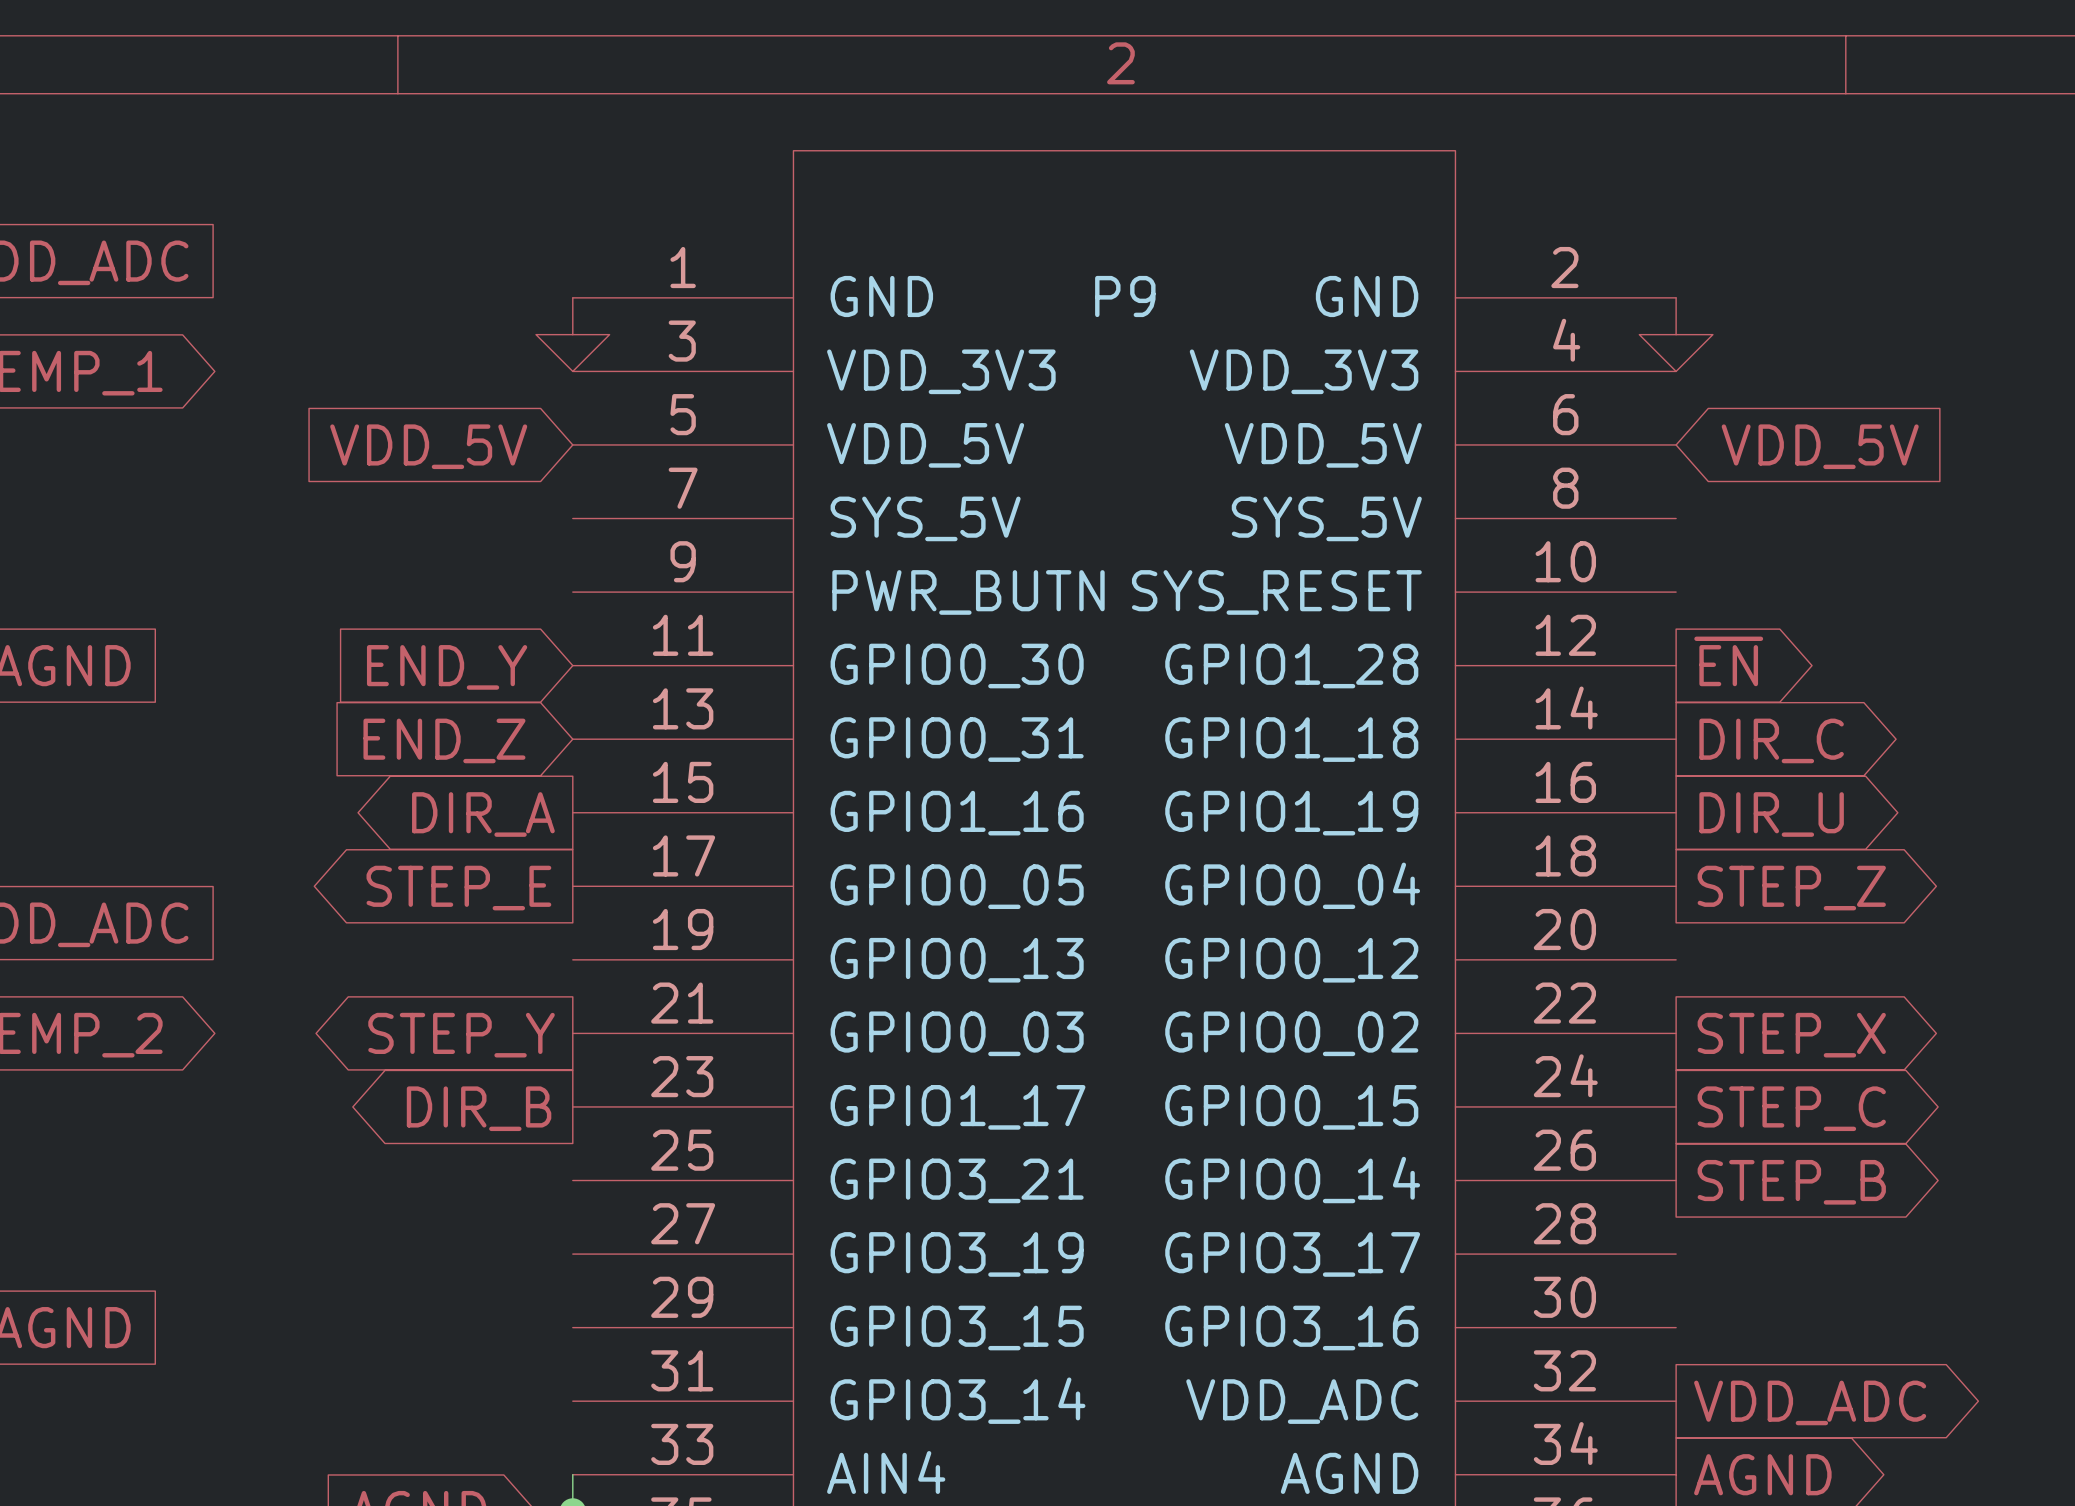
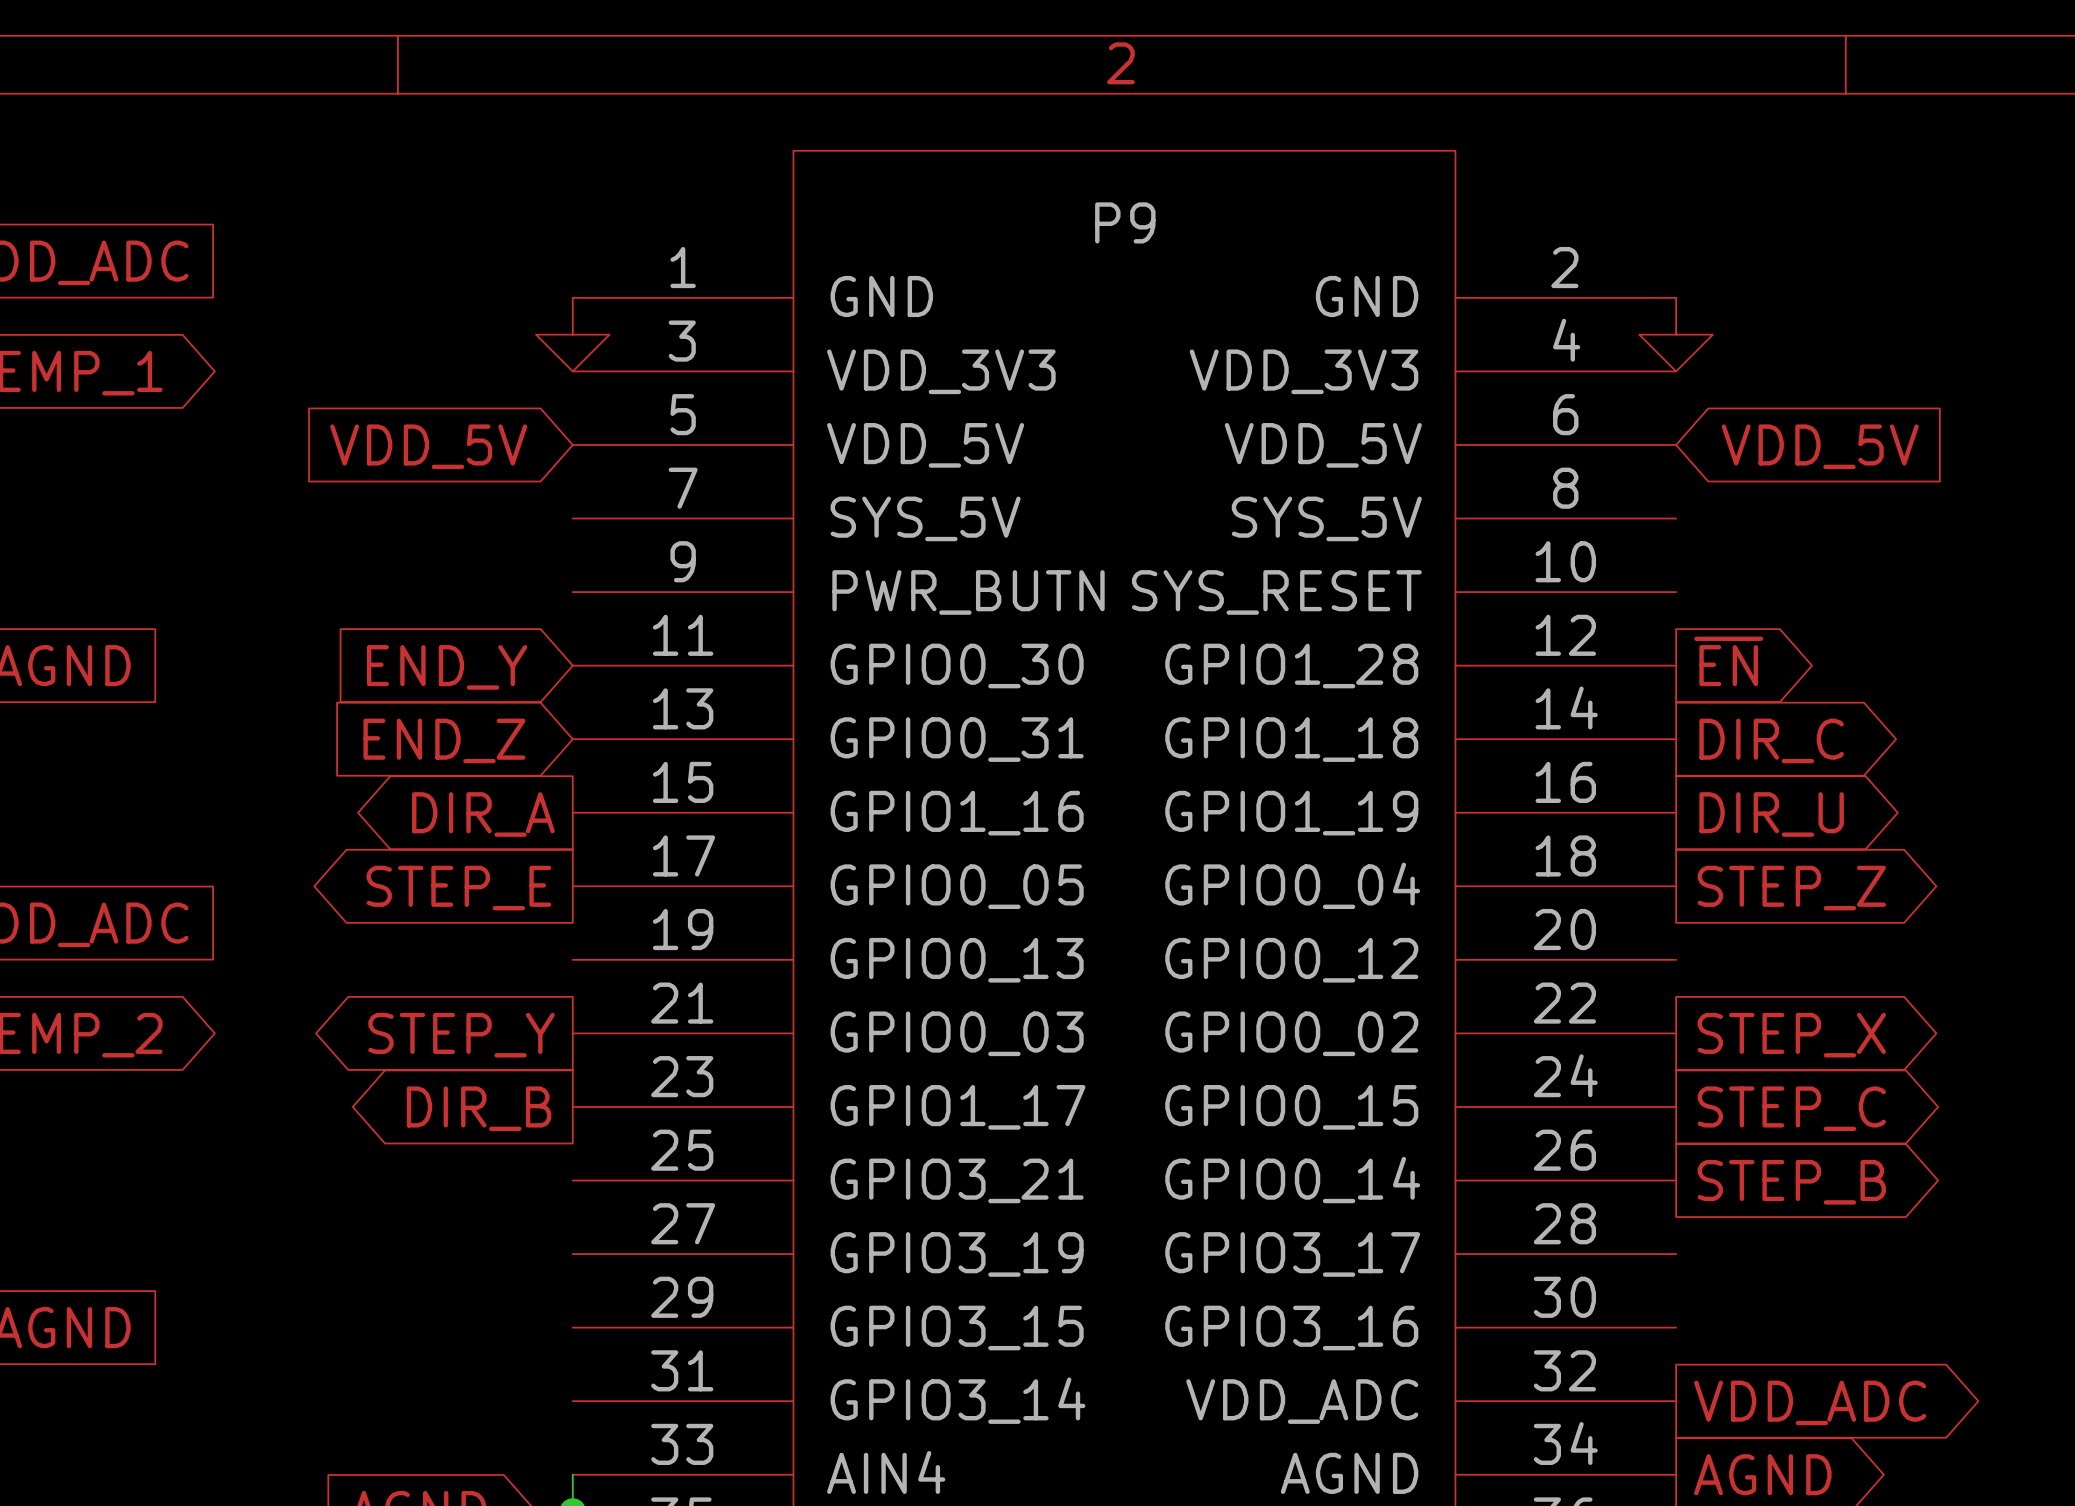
P9 name position: P9 (1125, 296) -> P9 (1125, 222)

